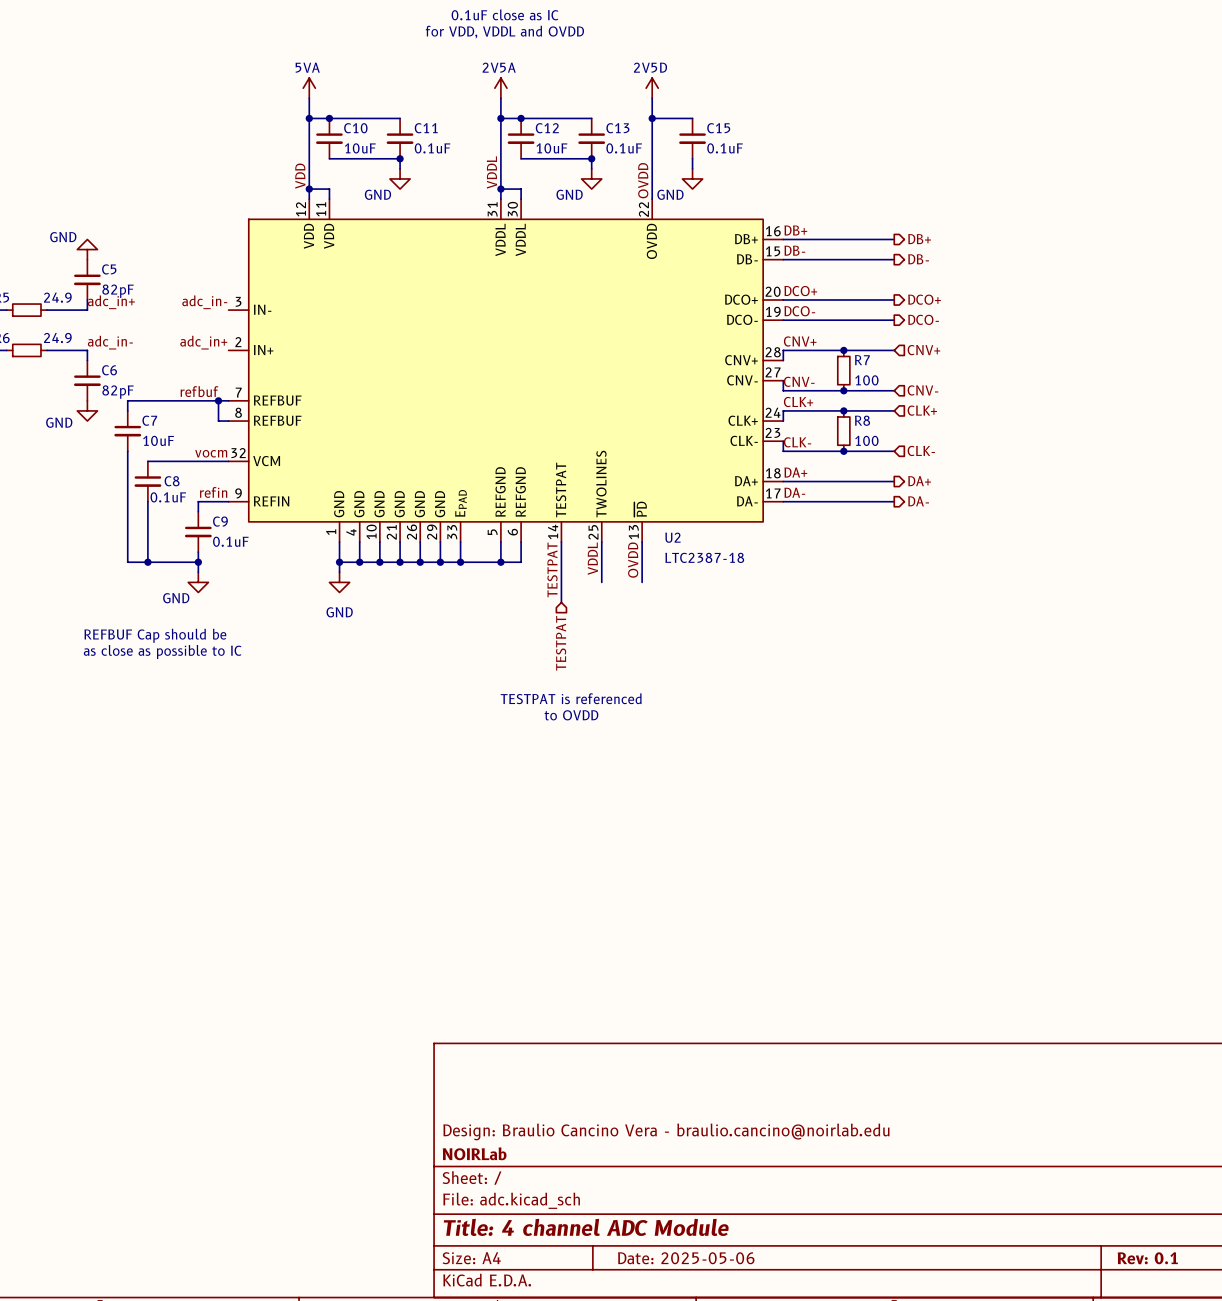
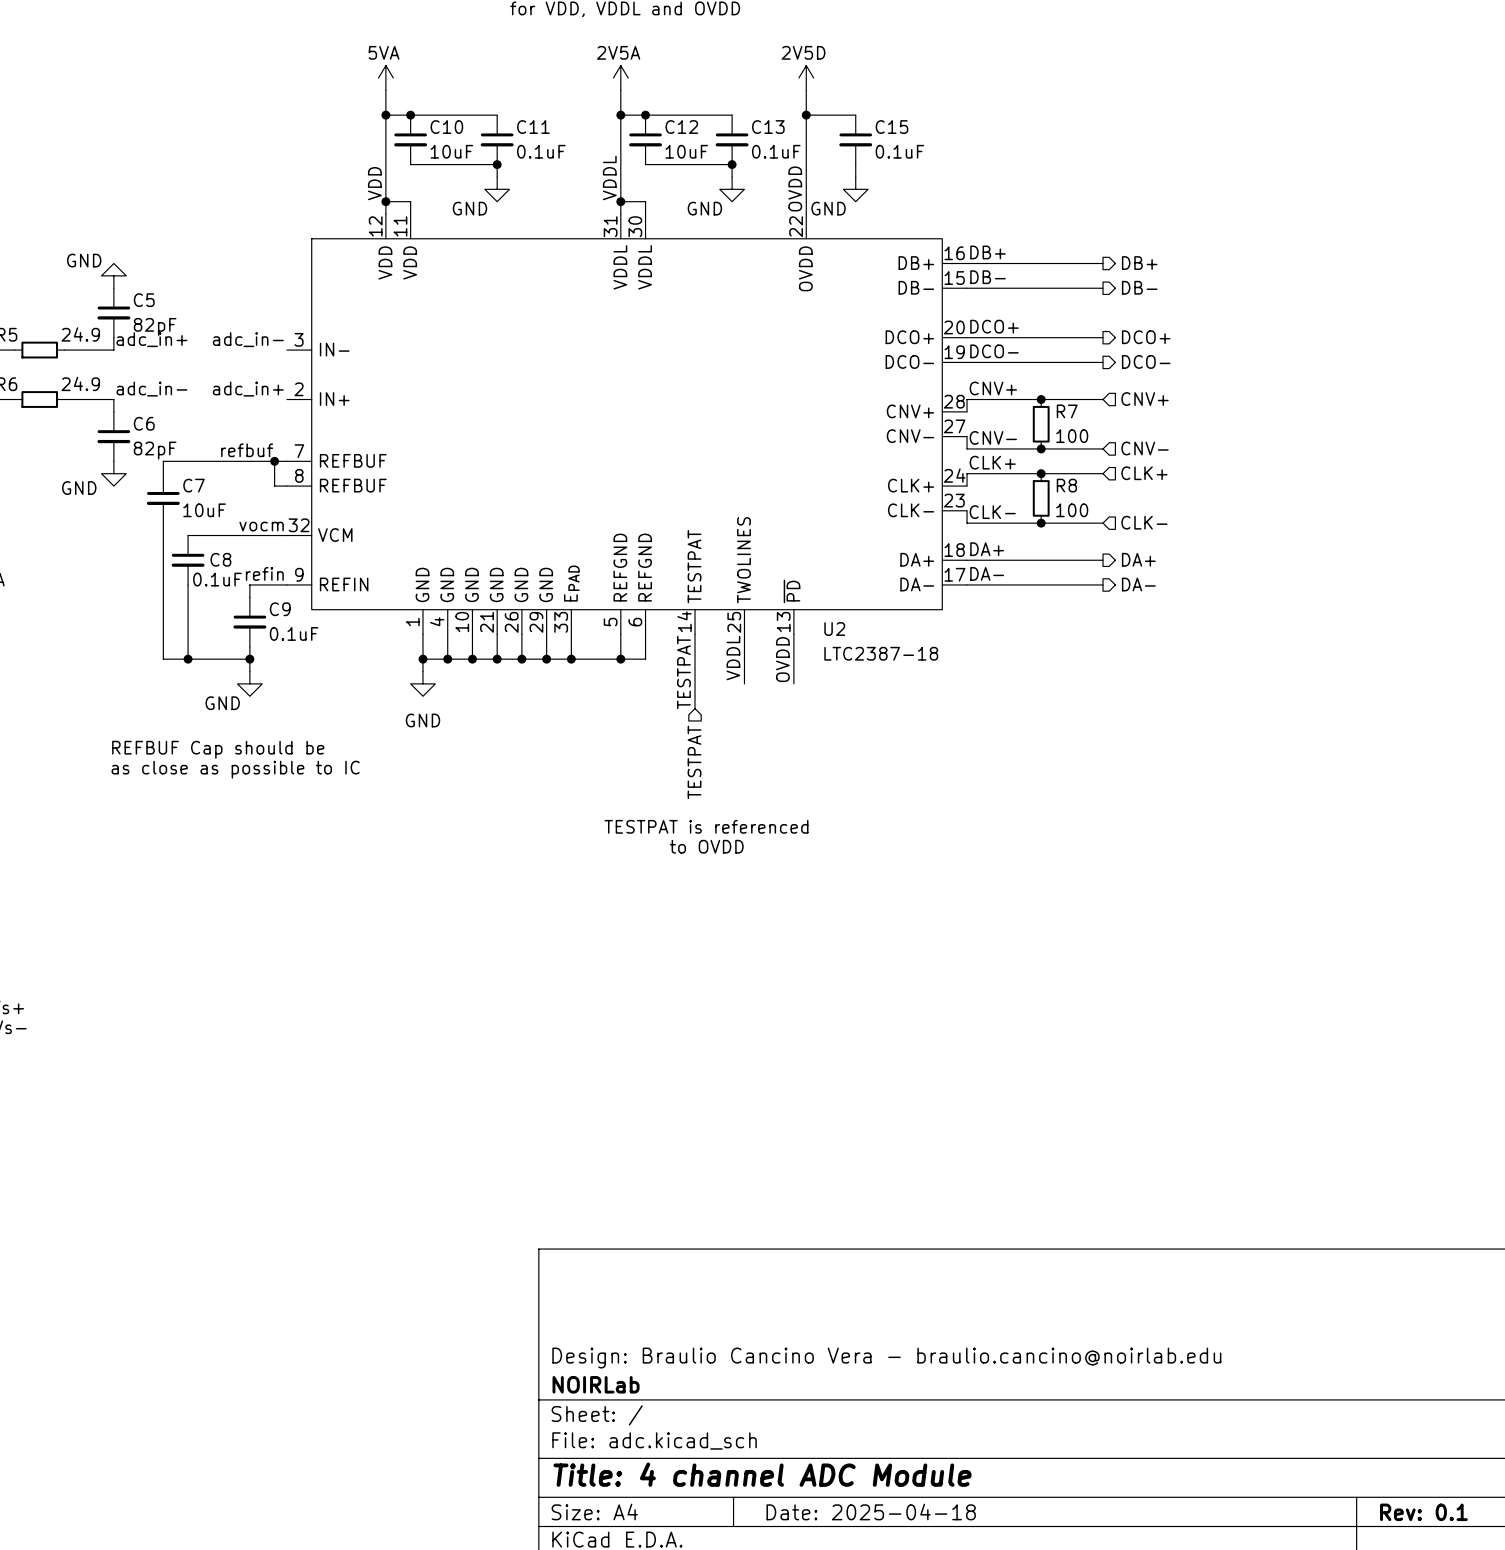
title block: Date: 2025-05-06 (686, 1258) -> Date: 2025-04-18 (871, 1511)

